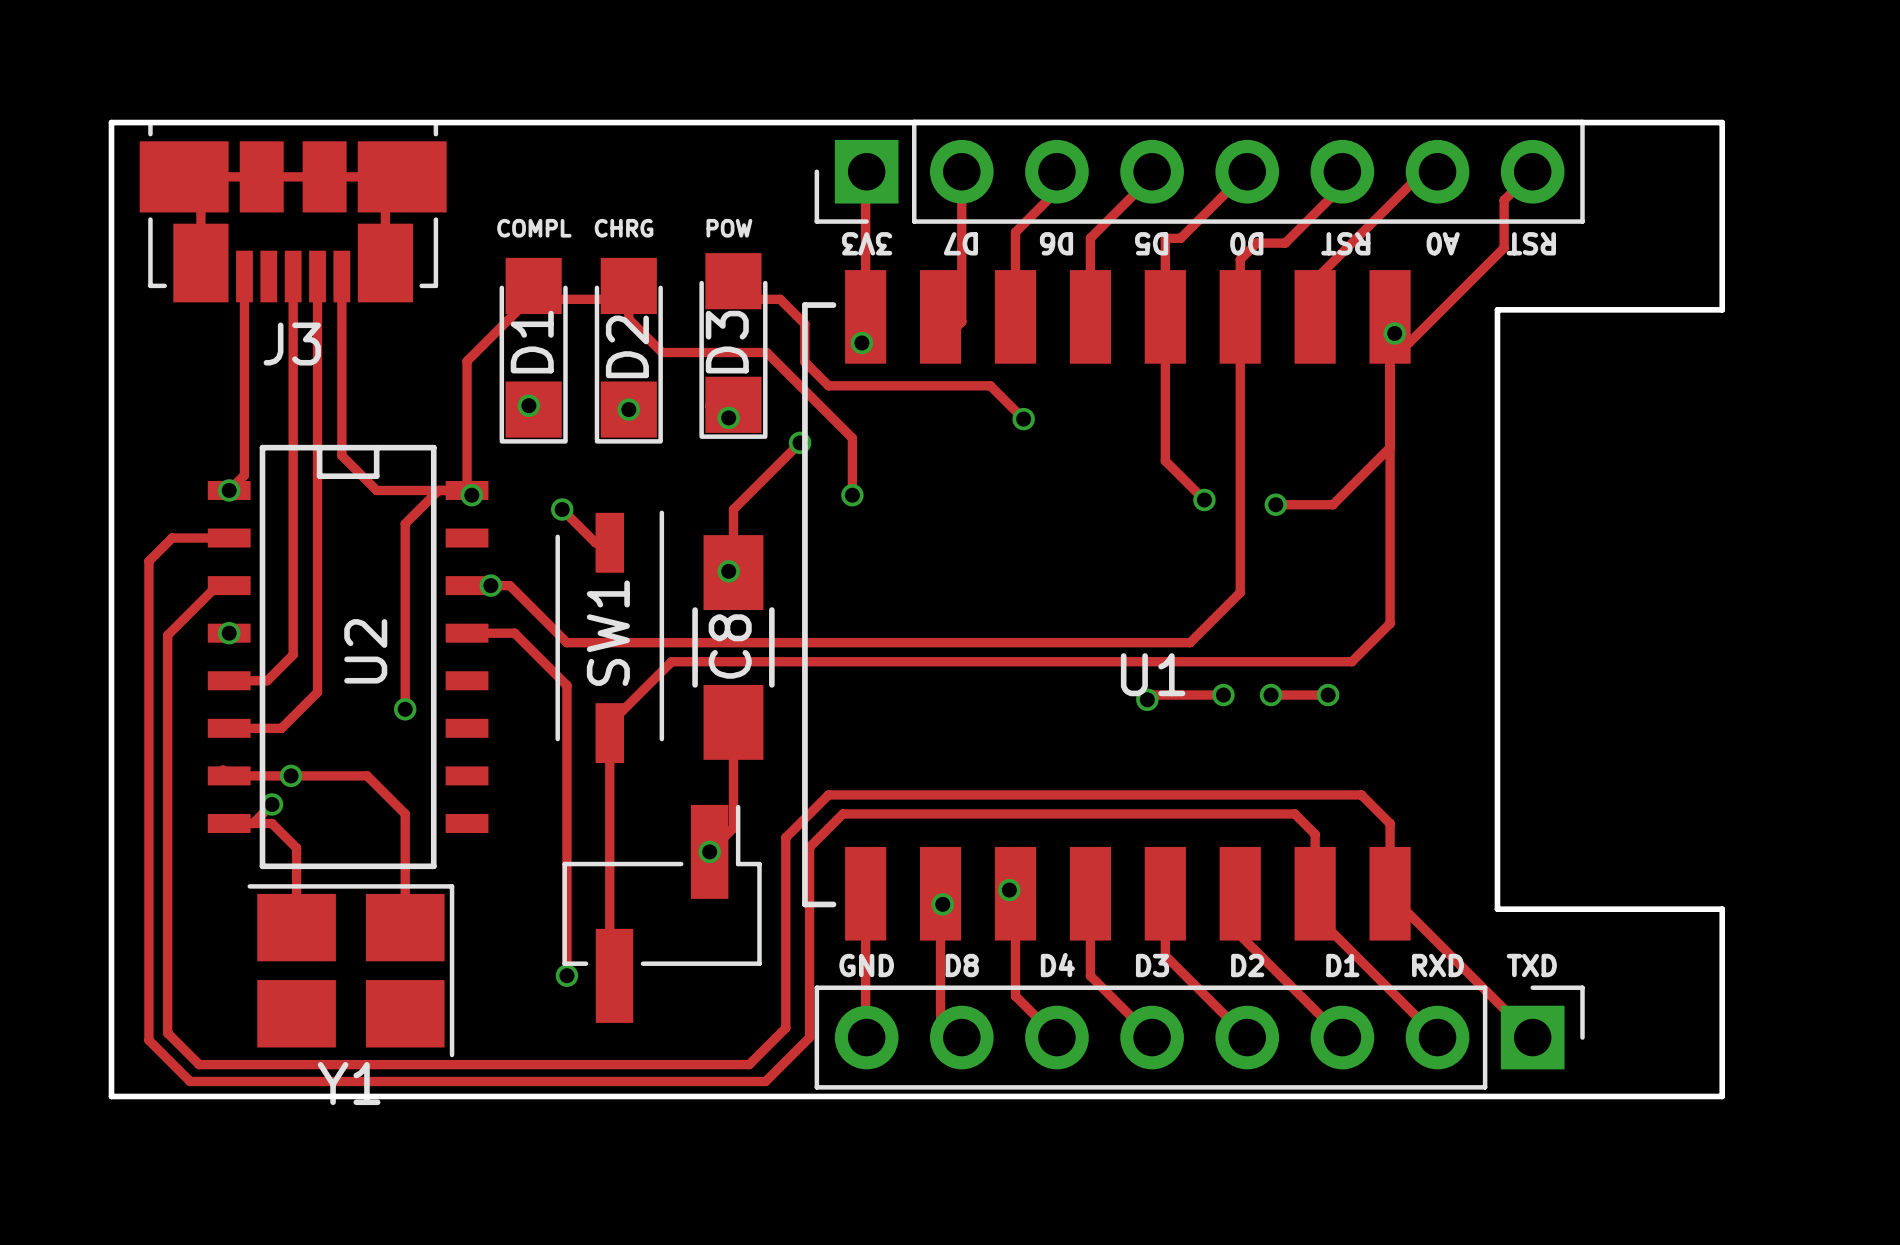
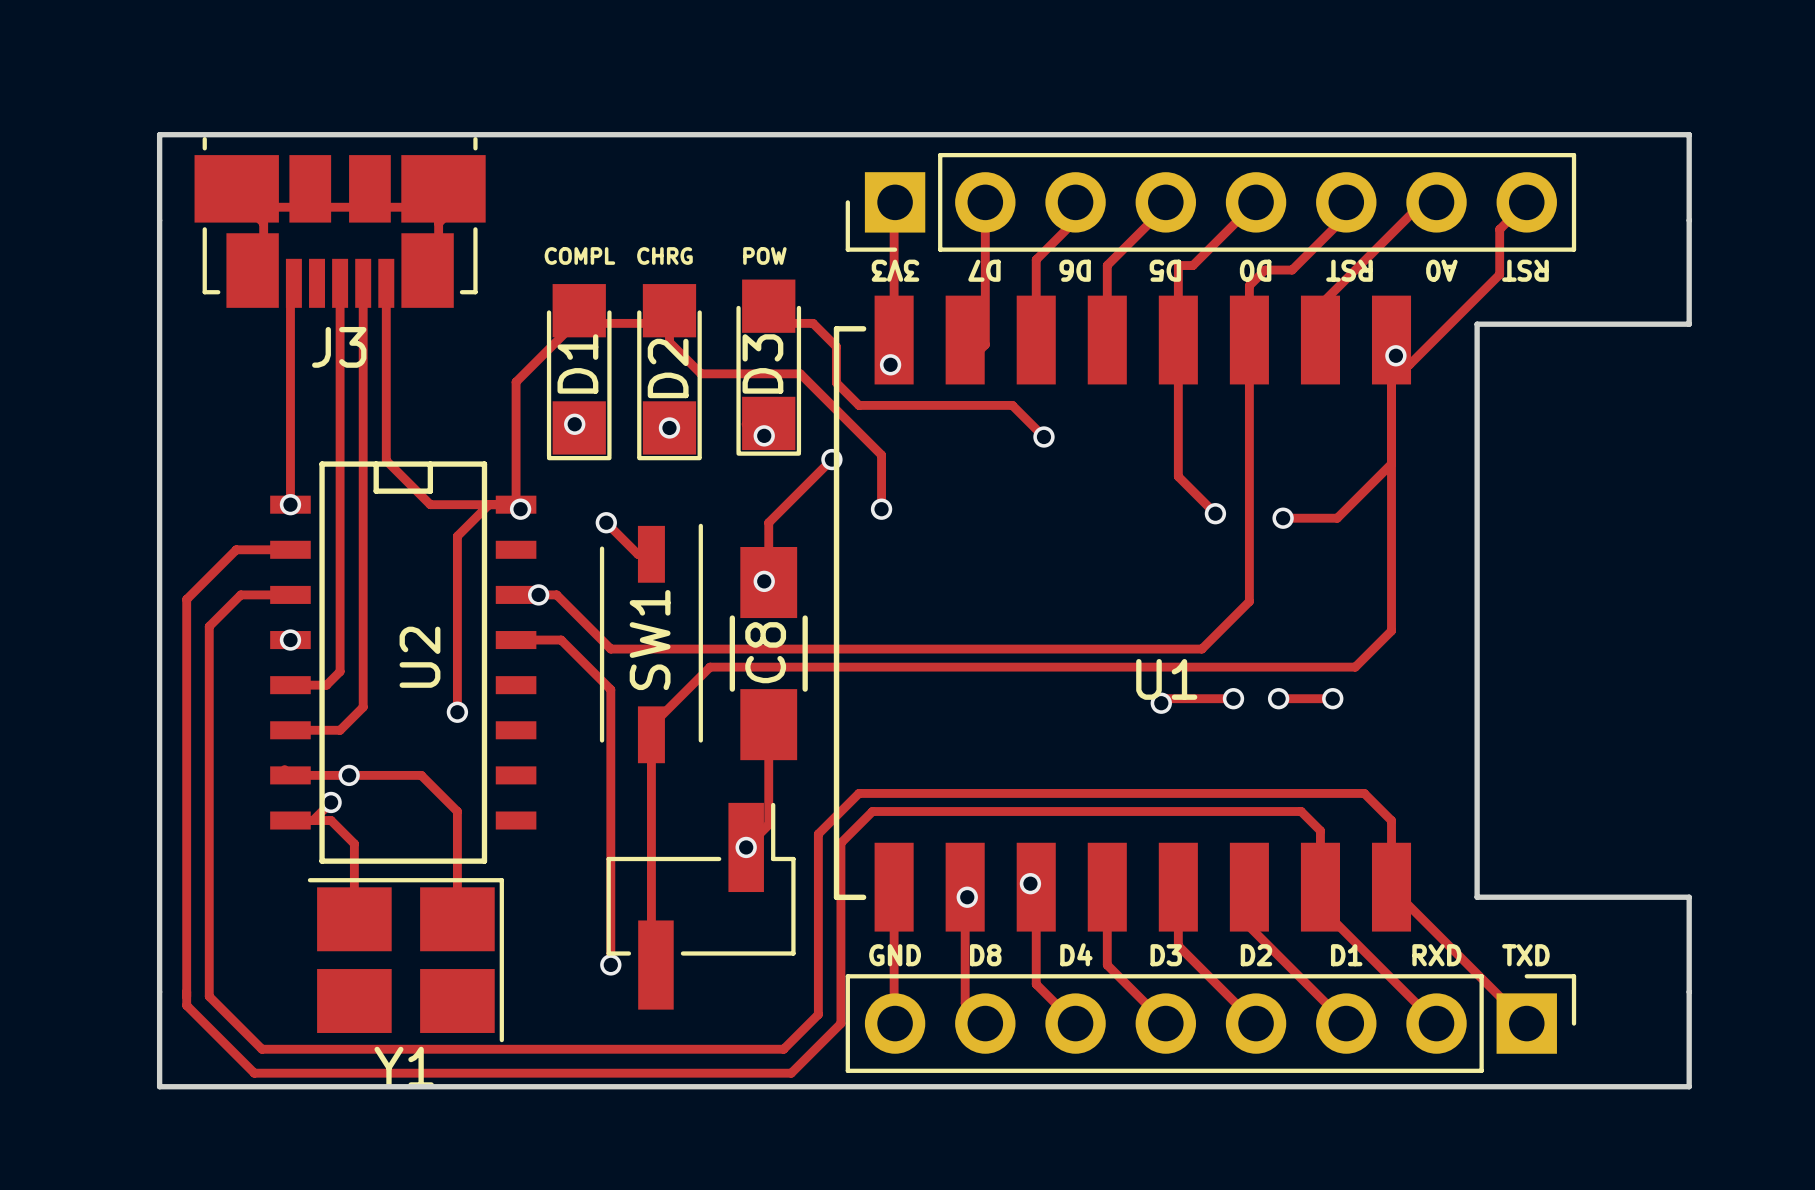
board edge: (111, 122) (111, 1096) (1722, 1096) (1722, 909) (1497, 909) (1497, 309) (1722, 309) (1722, 122) (111, 122) -> (159, 134) (159, 1086) (1689, 1086) (1689, 897) (1477, 897) (1477, 324) (1689, 324) (1689, 134) (159, 134)
J3 position: (293, 212) -> (340, 222)
track: none -> (293, 283) (290, 286) (290, 504)
track: (244, 276) (244, 475) (232, 486) -> none
track: (293, 276) (293, 654) (281, 666) -> (340, 283) (340, 671)
track: (317, 276) (317, 692) (305, 703) -> (363, 283) (363, 707)
track: (341, 276) (341, 455) -> (386, 283) (386, 460) (397, 471)
track: (148, 561) (148, 1040) (190, 1081) (765, 1081) -> (214, 571) (186, 599) (186, 1005) (254, 1073) (791, 1073) (799, 1065)
track: (217, 585) (167, 635) (167, 1033) -> (279, 594) (240, 594) (209, 626) (209, 996) (232, 1019)

